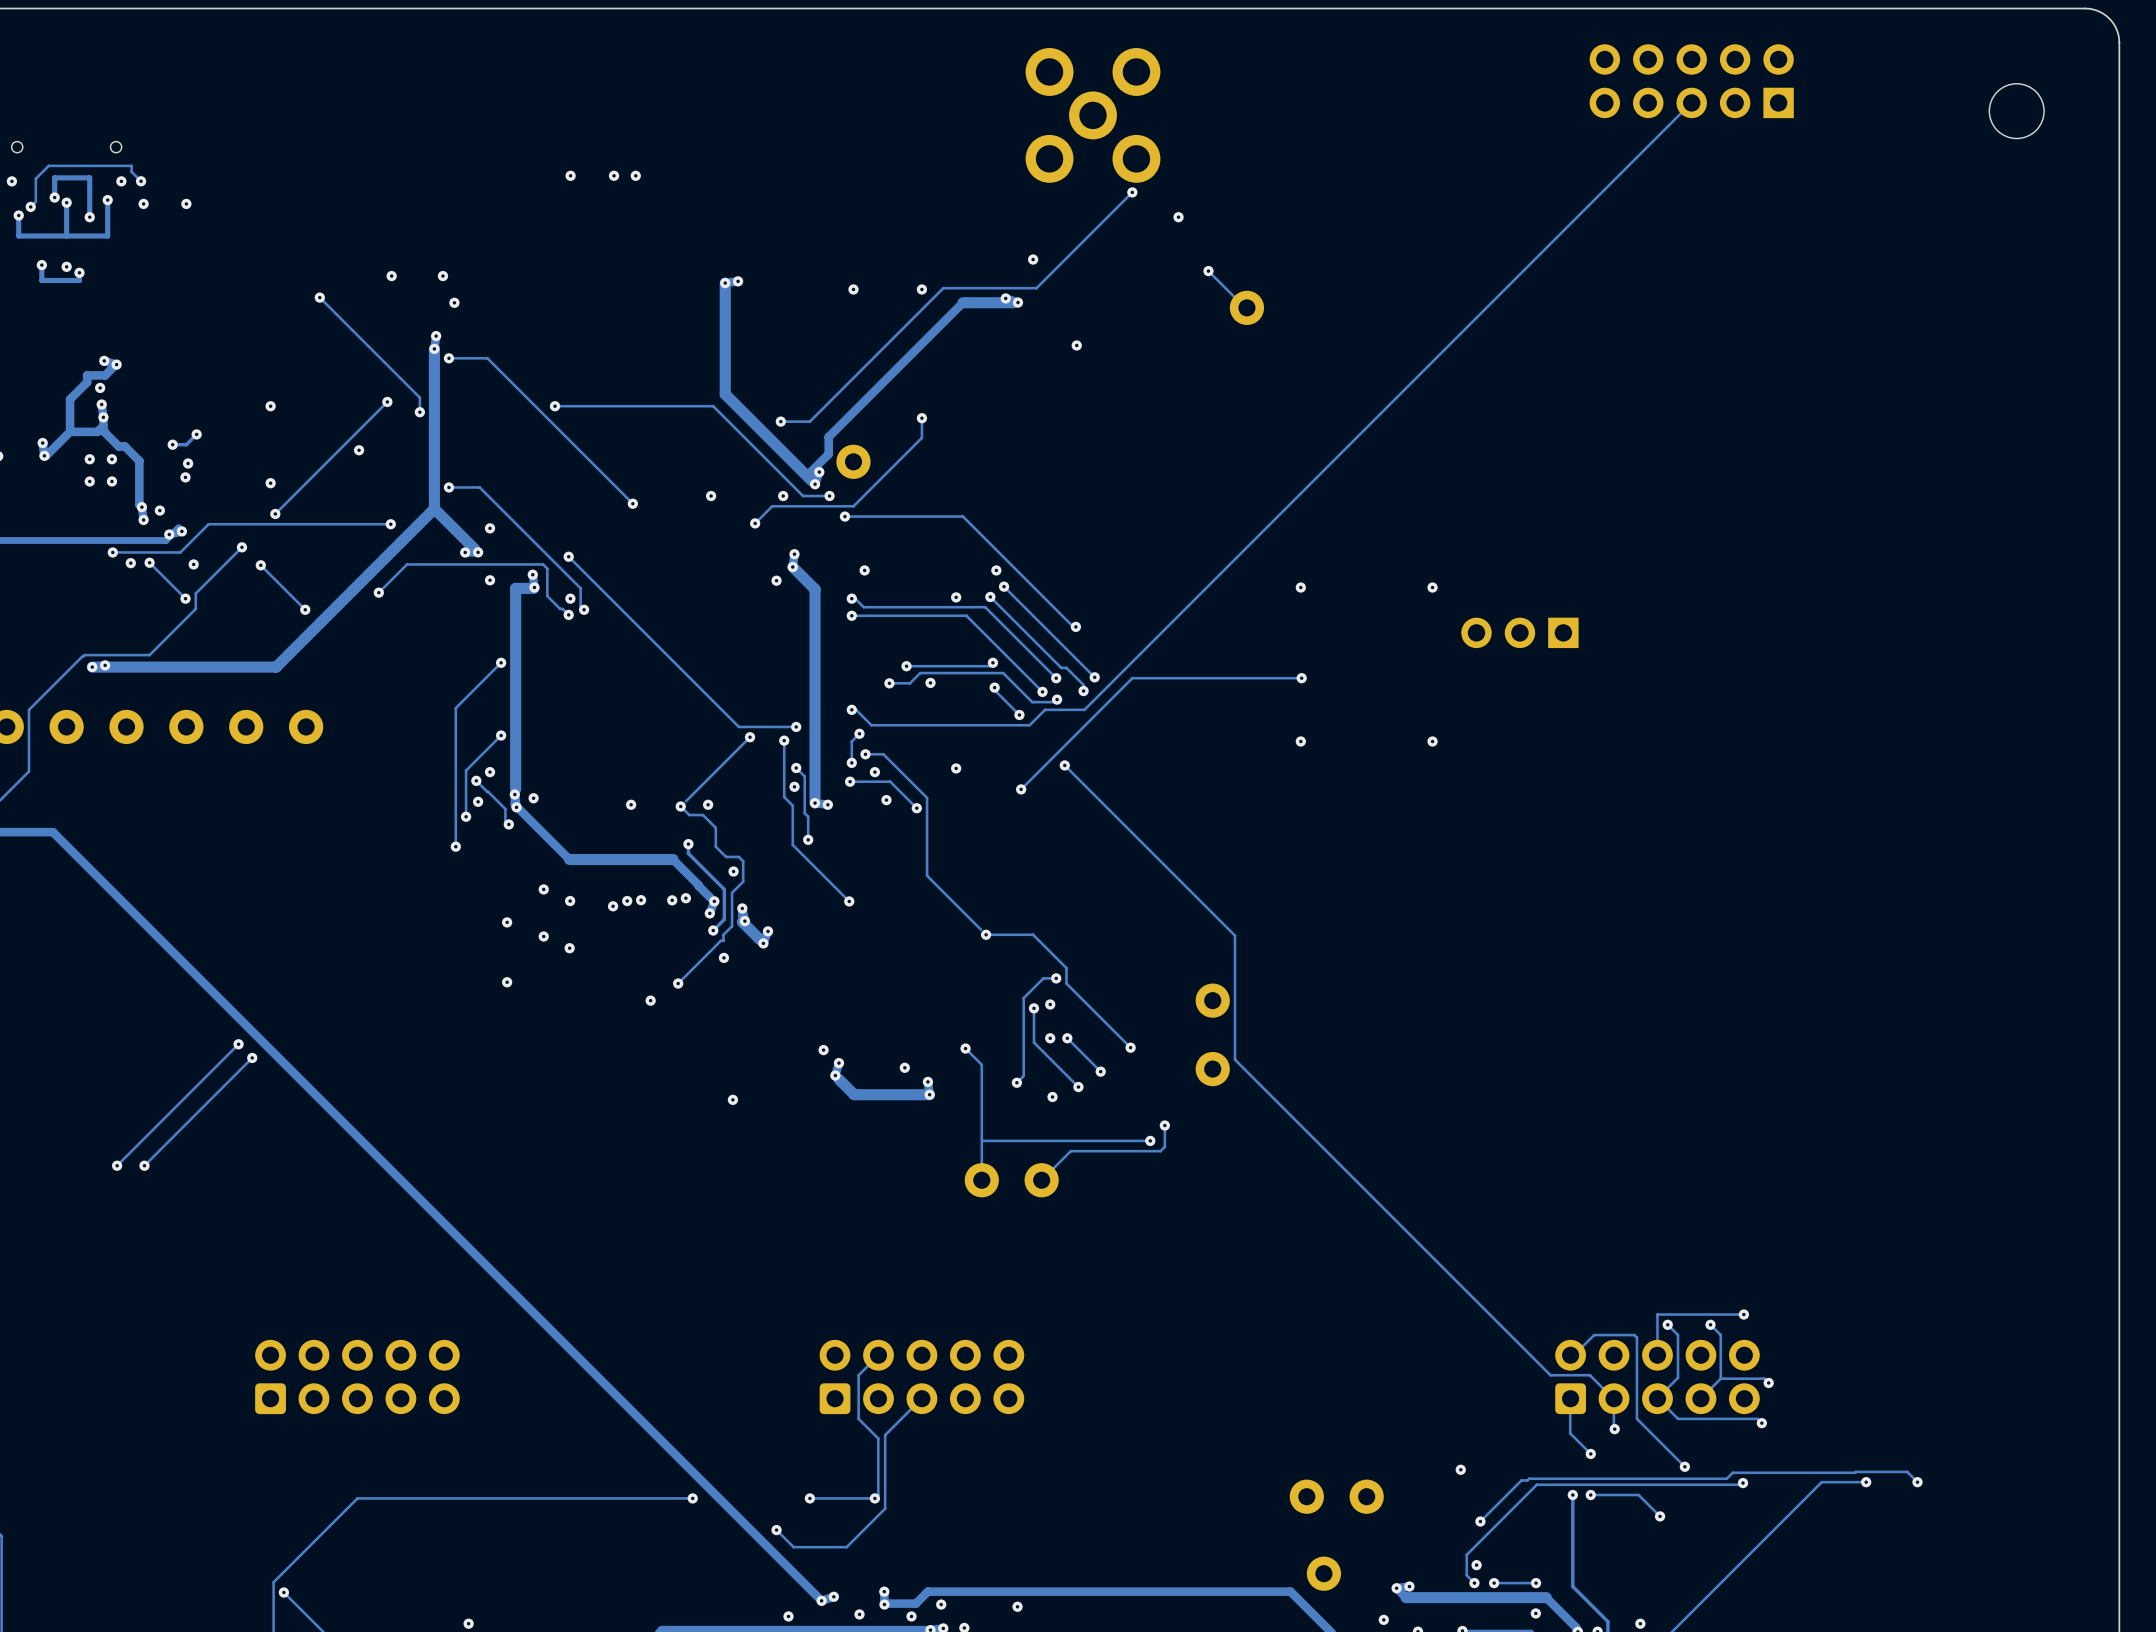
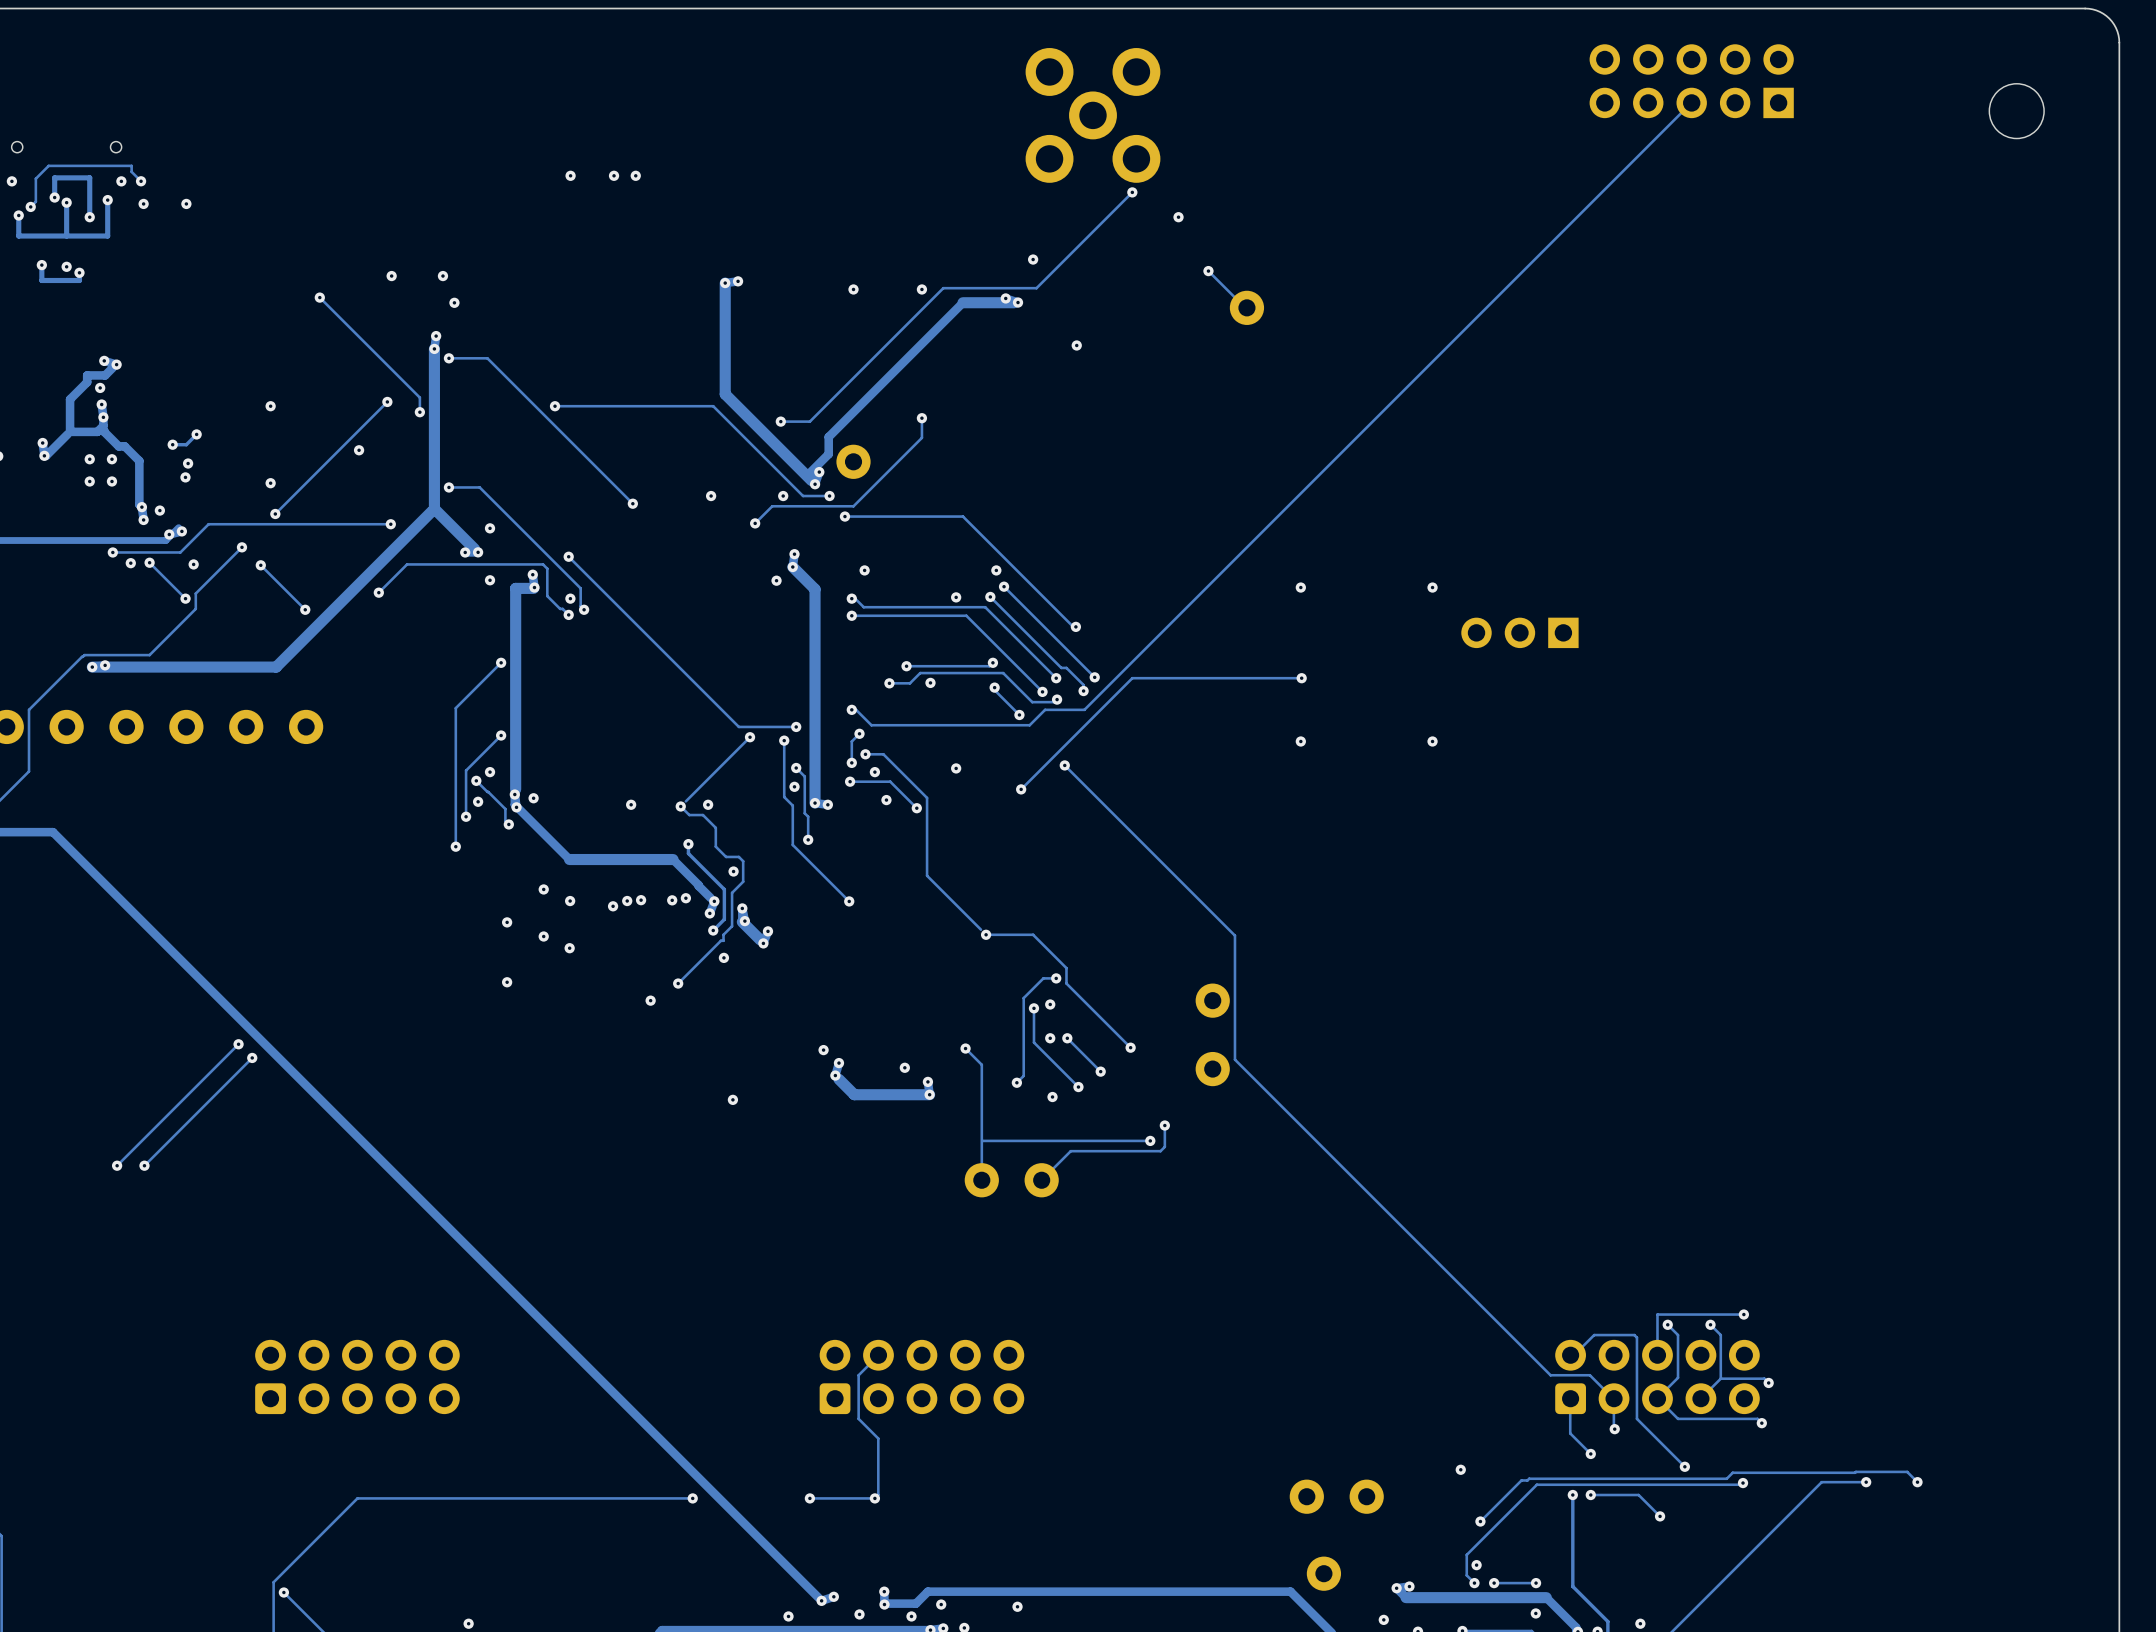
track: (921, 1399) (885, 1435) (885, 1508) (846, 1547) (793, 1547) (776, 1530) -> none
via: (776, 1530) -> none

